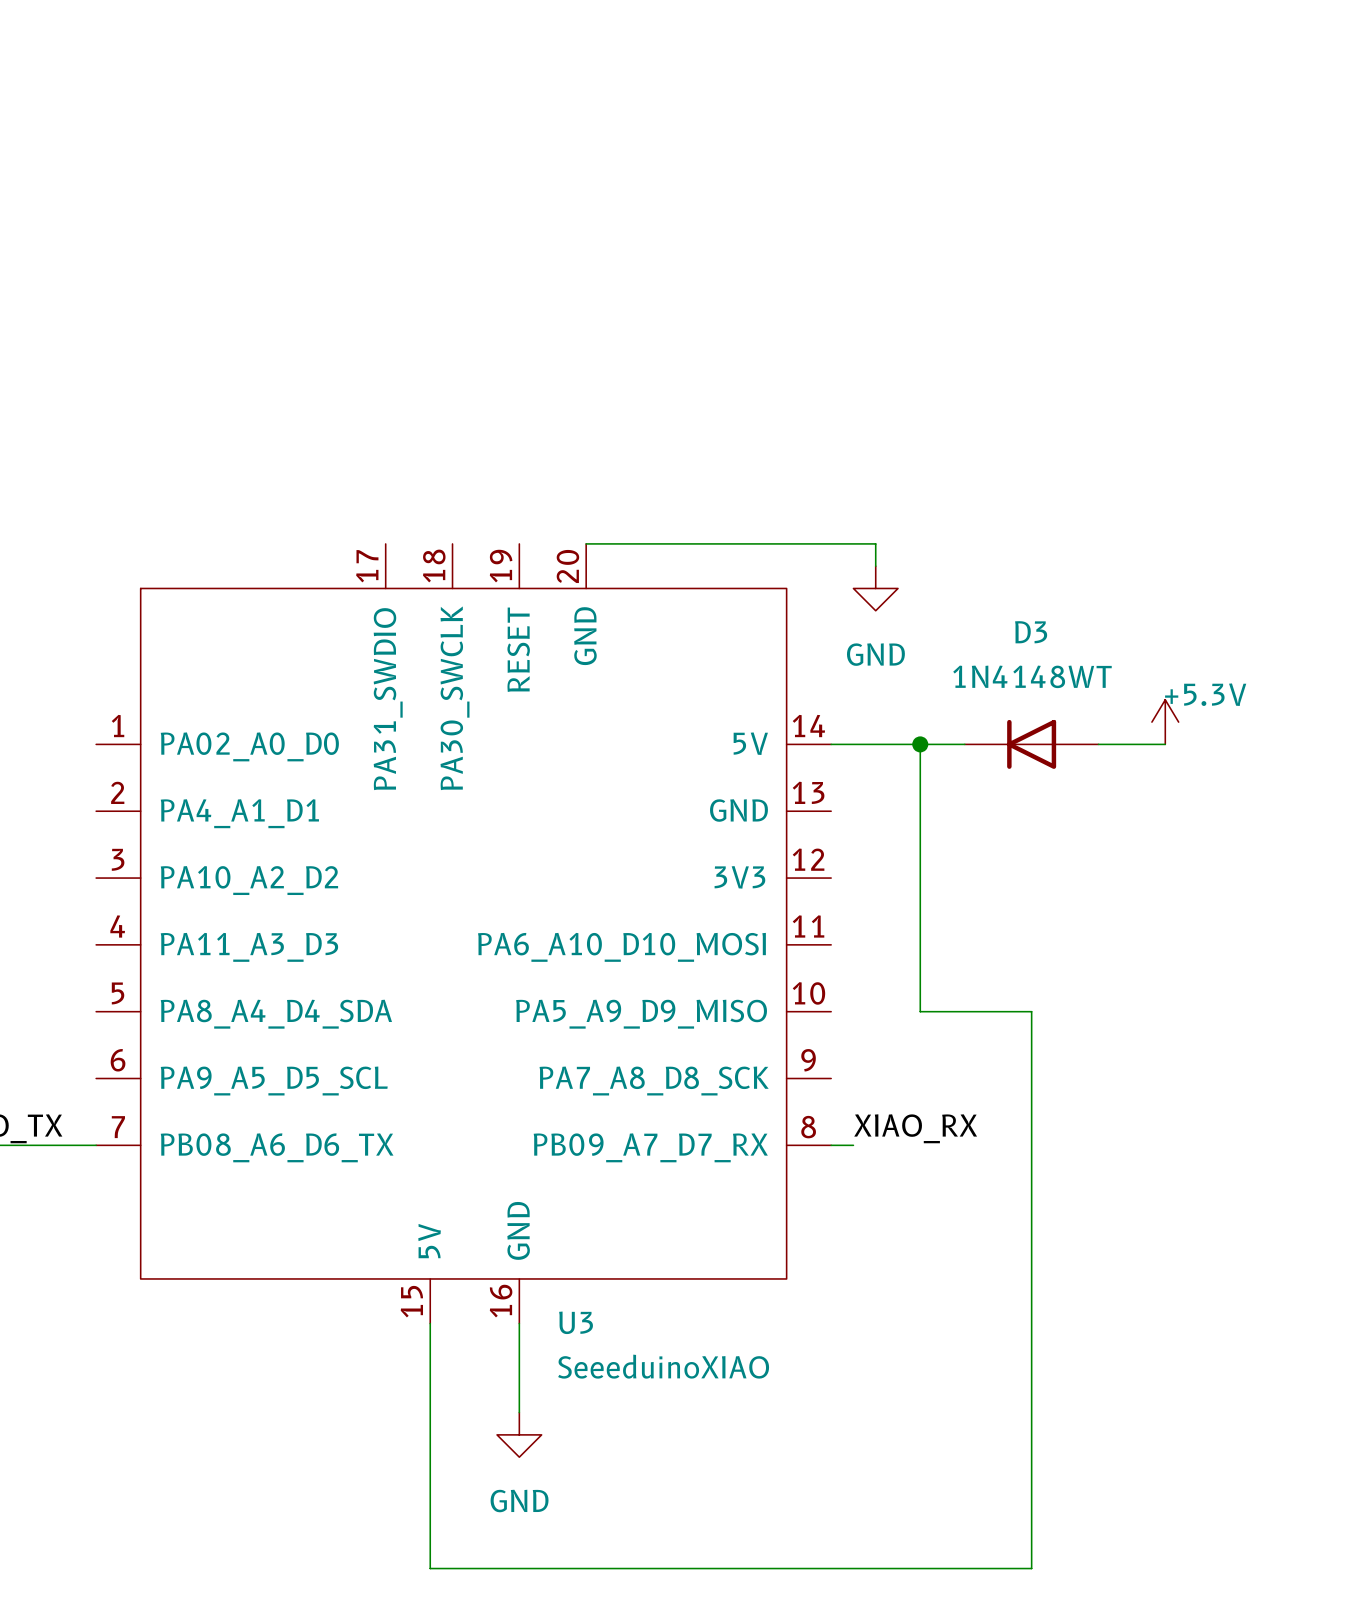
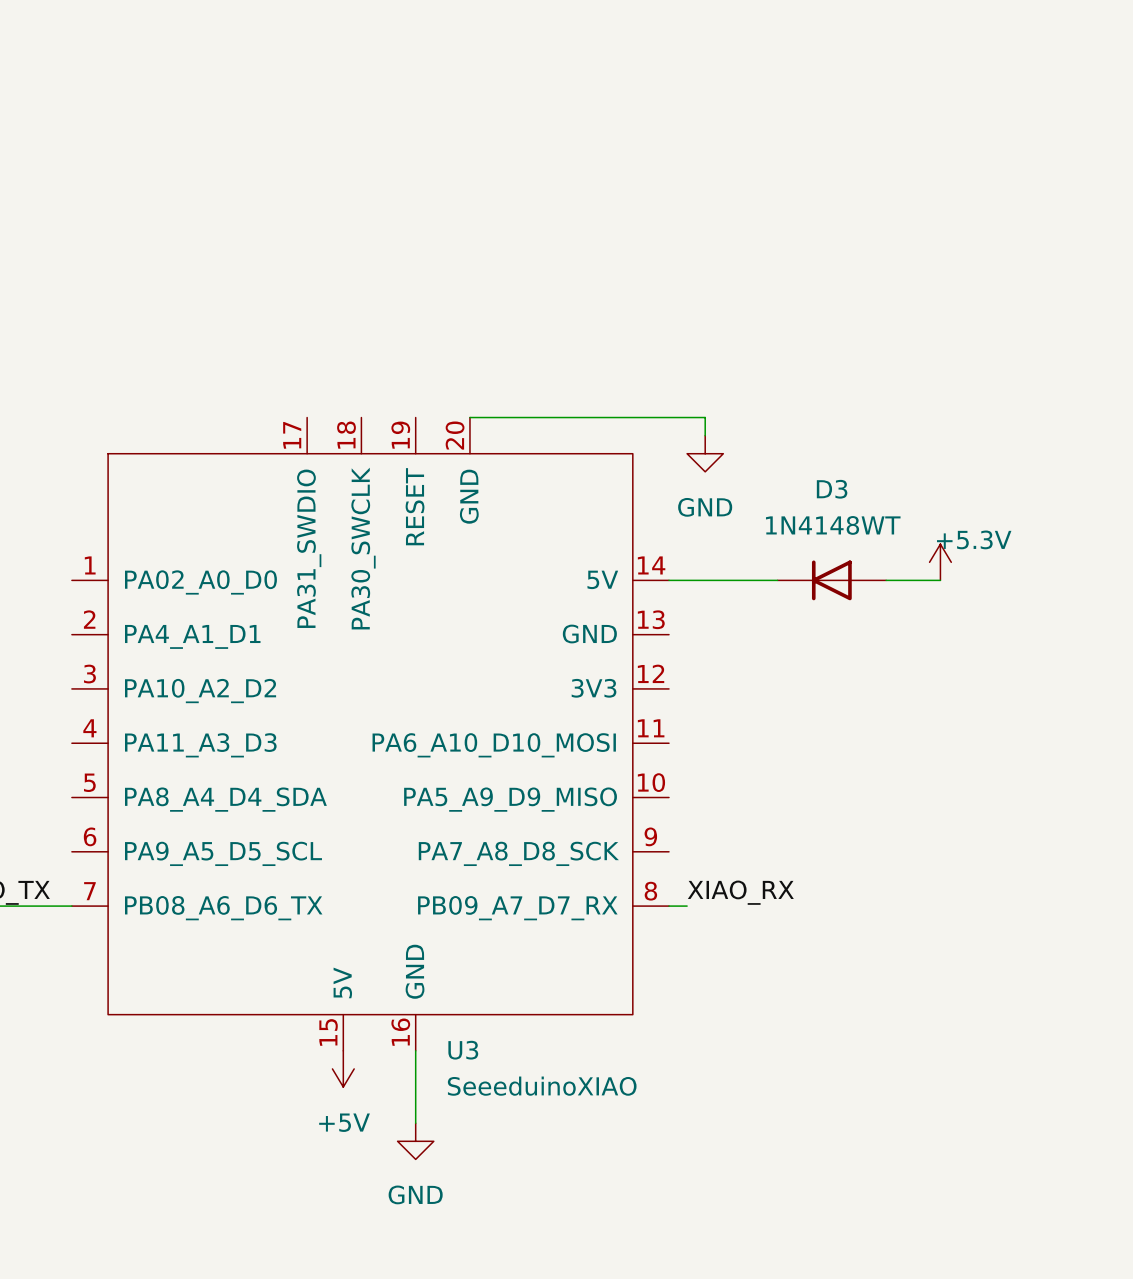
wire: (920, 744) (920, 1011) (1031, 1011) (1031, 1568) (430, 1568) (430, 1323) -> none
junction: (920, 744) -> none
power symbol: none -> +5V (343, 1068)

